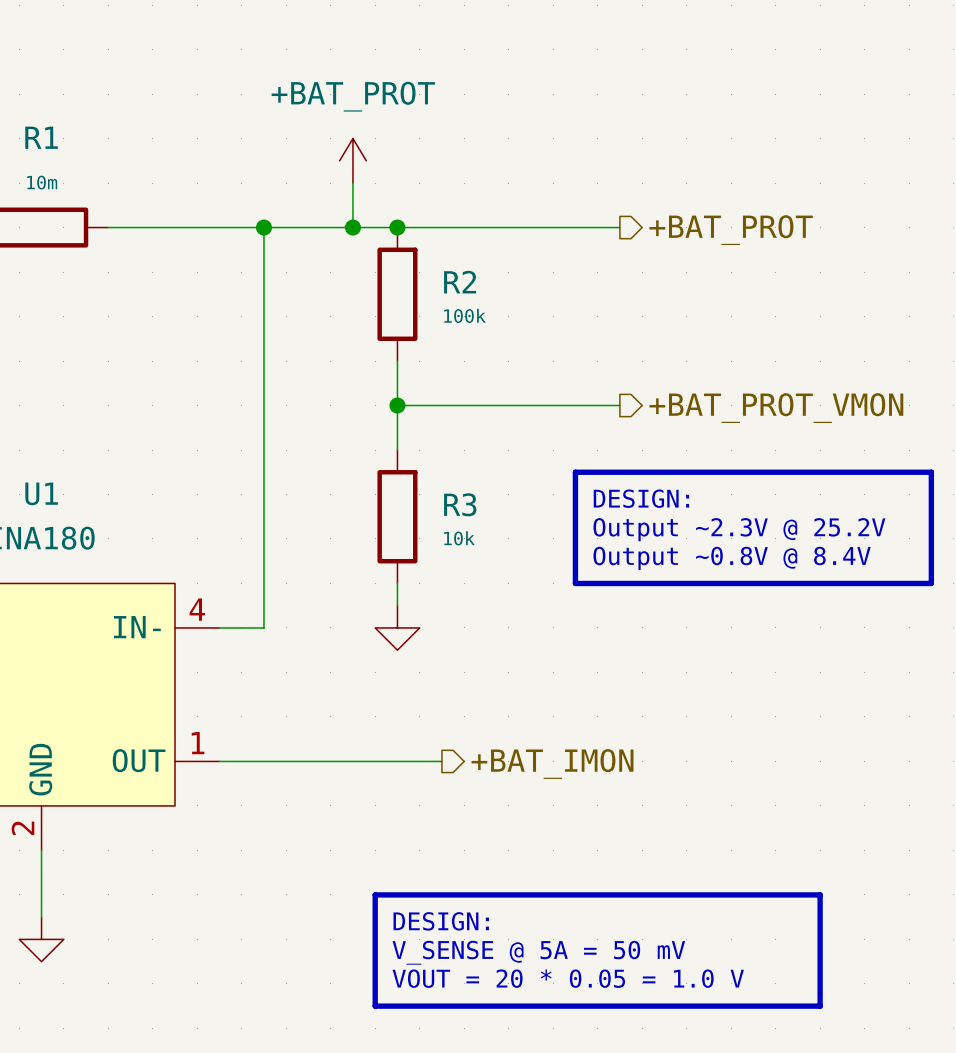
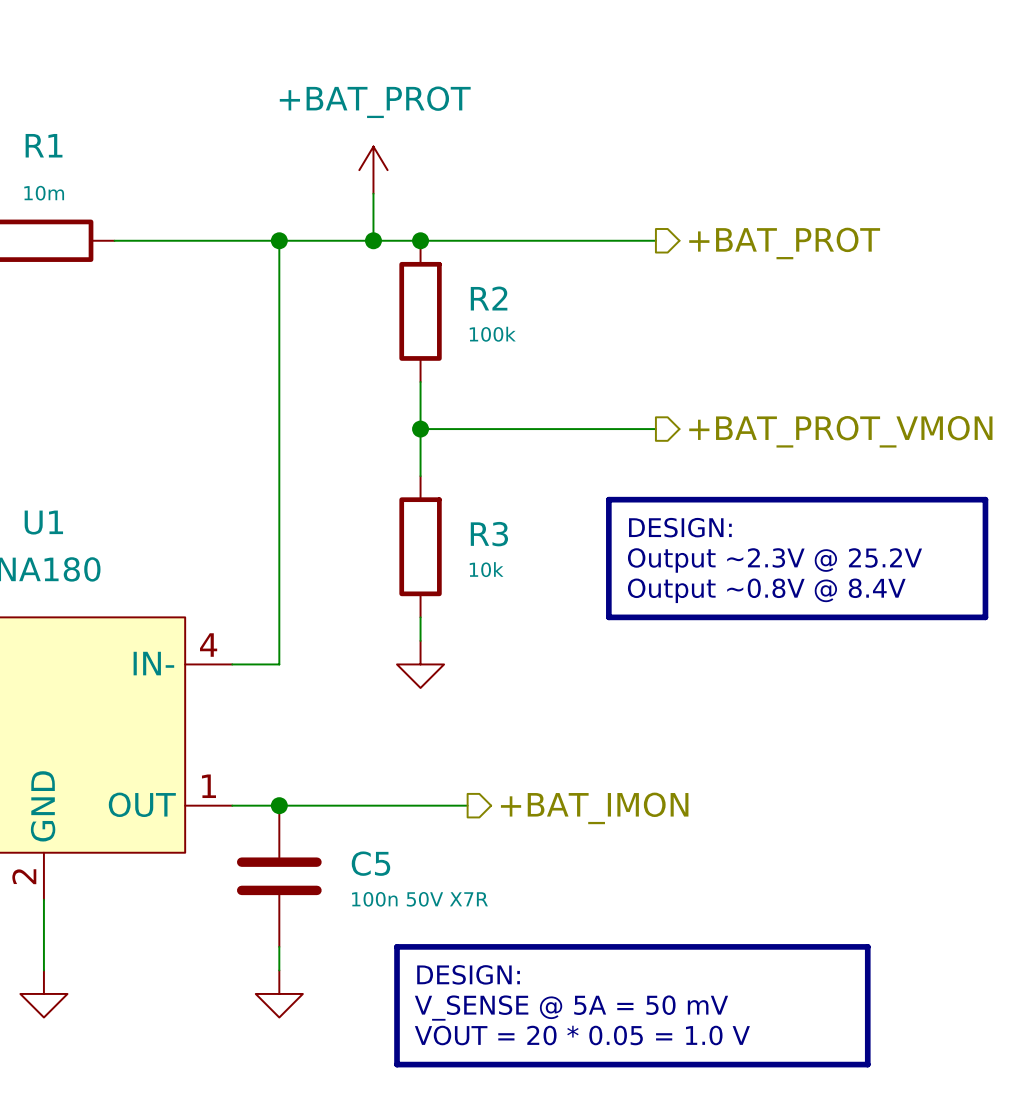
junction: none -> (279, 805)
C5: none -> 100n 50V X7R (279, 876)
wire: none -> (279, 946) (279, 970)
power symbol: none -> (279, 993)

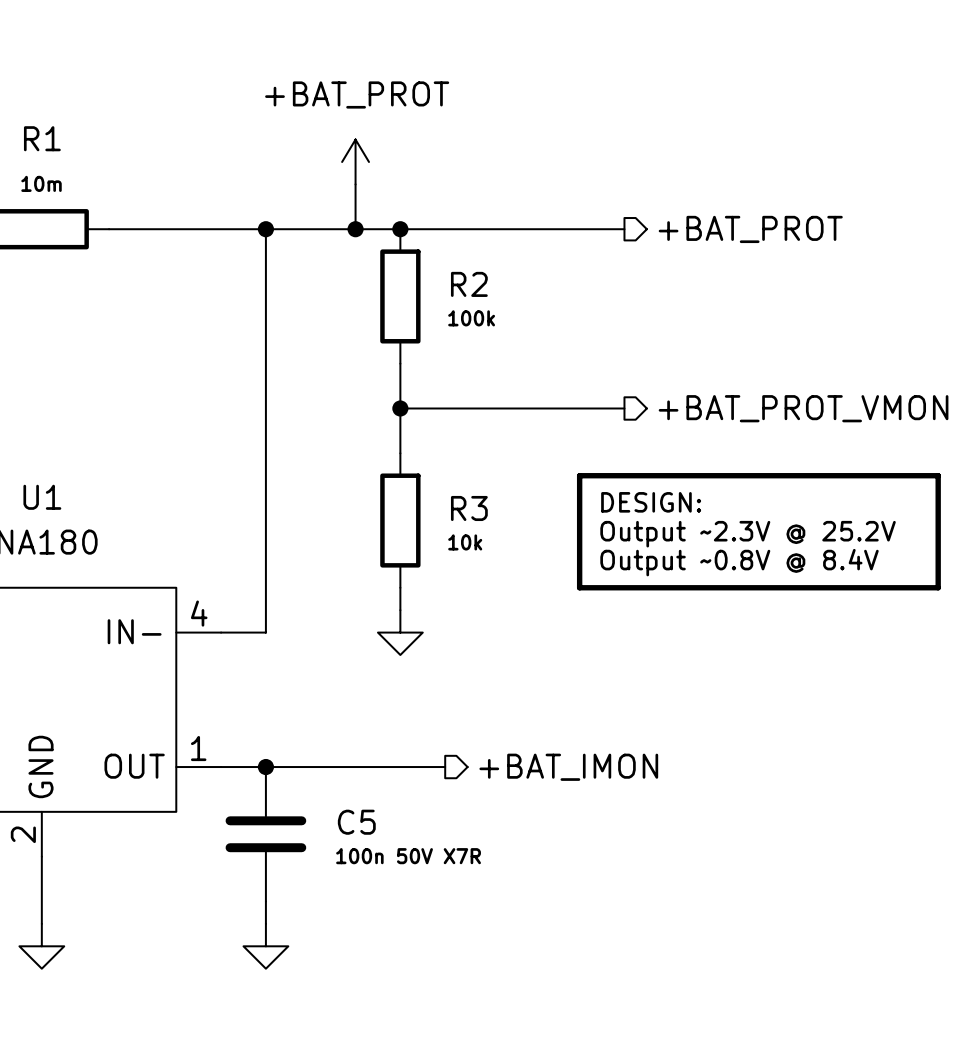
line: (397, 946) (867, 946) (867, 1064) (397, 1064) (397, 946) -> none
text: DESIGN: (468, 974) -> none
text: V_SENSE @ 5A = 50 mV (571, 1008) -> none
text: VOUT = 20 * 0.05 = 1.0 V (582, 1035) -> none

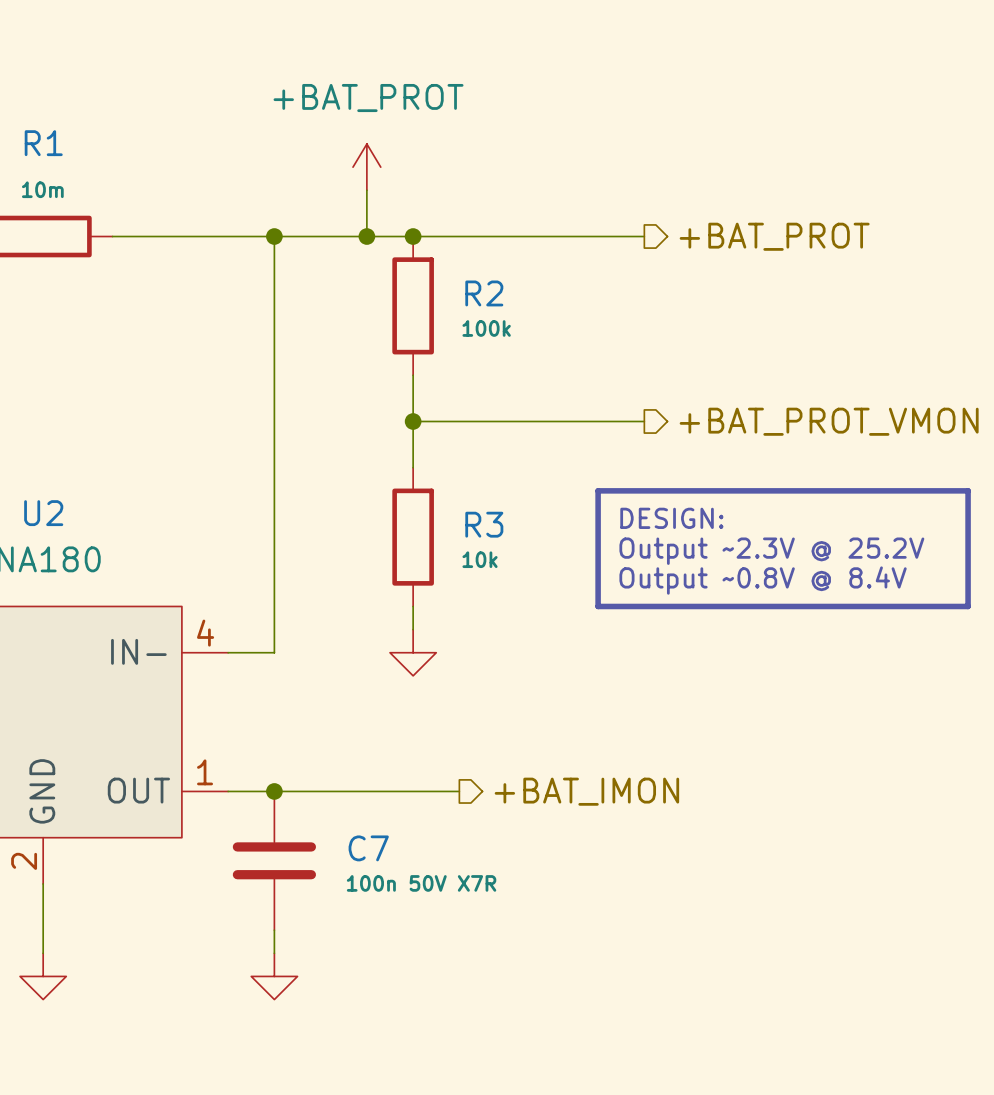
U1 name: U1 (42, 497) -> U2 (43, 513)
C5 name: C5 (356, 822) -> C7 (368, 848)

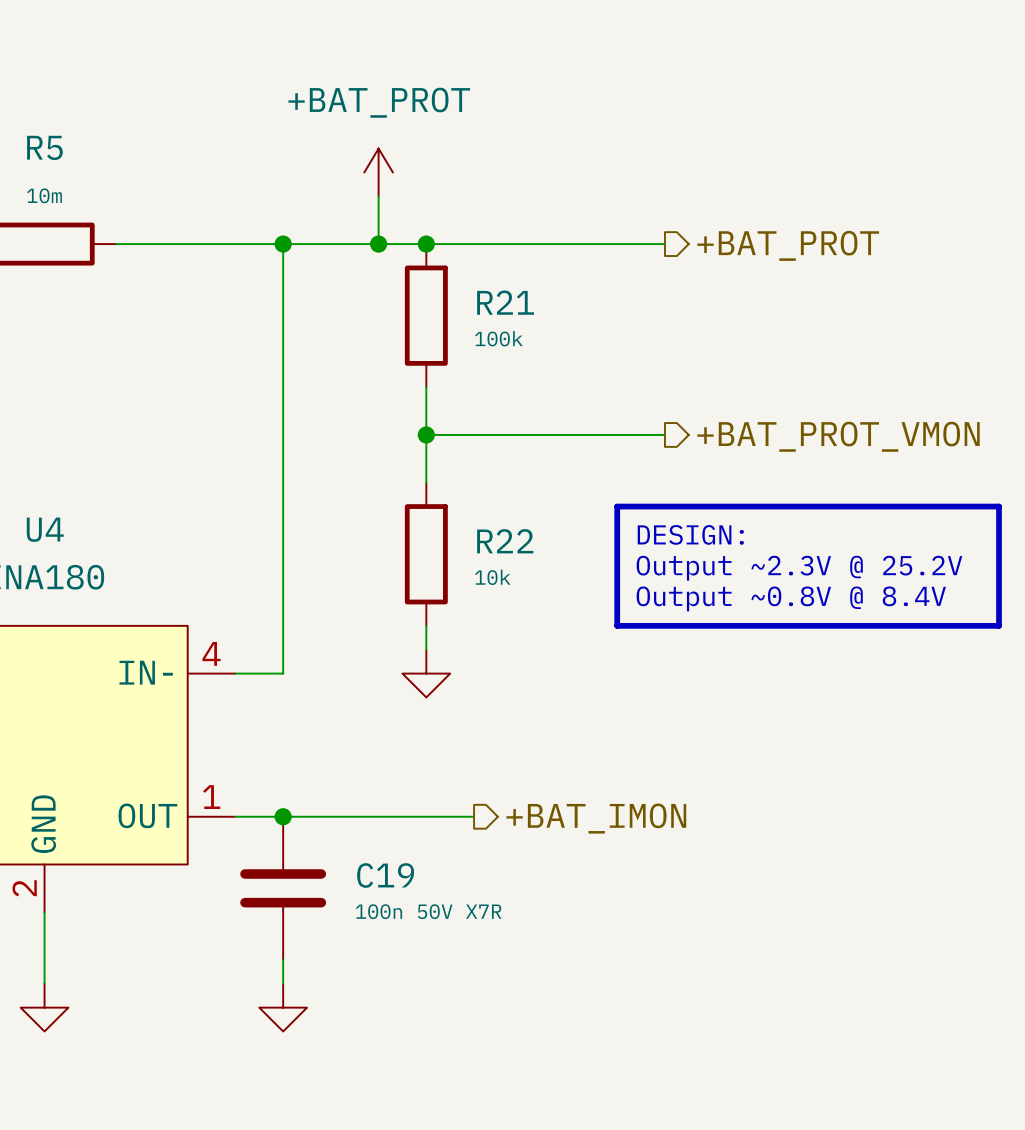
R1 name: R1 (43, 143) -> R5 (44, 147)
R2 name: R2 (484, 293) -> R21 (505, 302)
U2 name: U2 (43, 513) -> U4 (45, 529)
R3 name: R3 (484, 524) -> R22 (505, 541)
C7 name: C7 (368, 848) -> C19 (385, 875)

